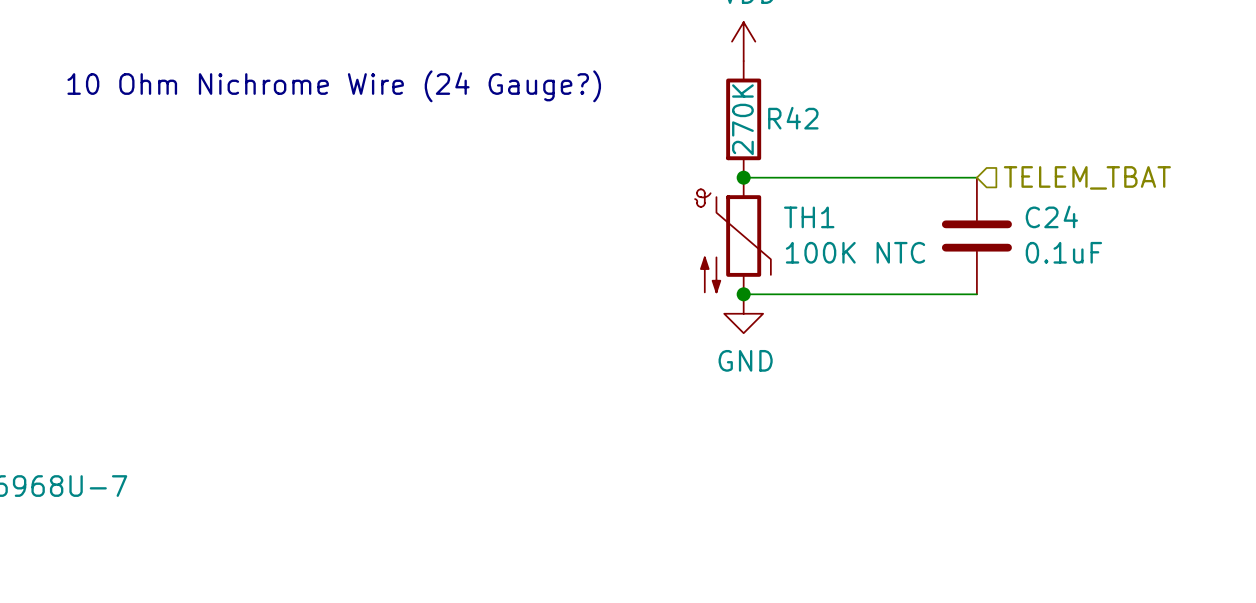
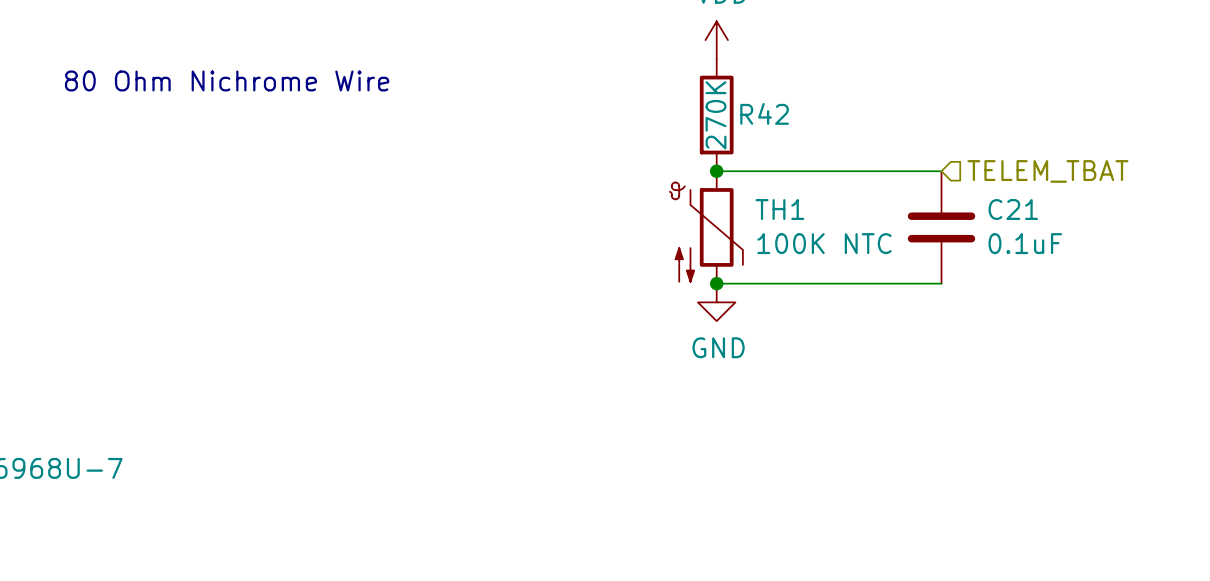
text: 10 Ohm Nichrome Wire (24 Gauge?) (334, 86) -> 80 Ohm Nichrome Wire (227, 80)
C24 name: C24 (1051, 216) -> C21 (1013, 209)

